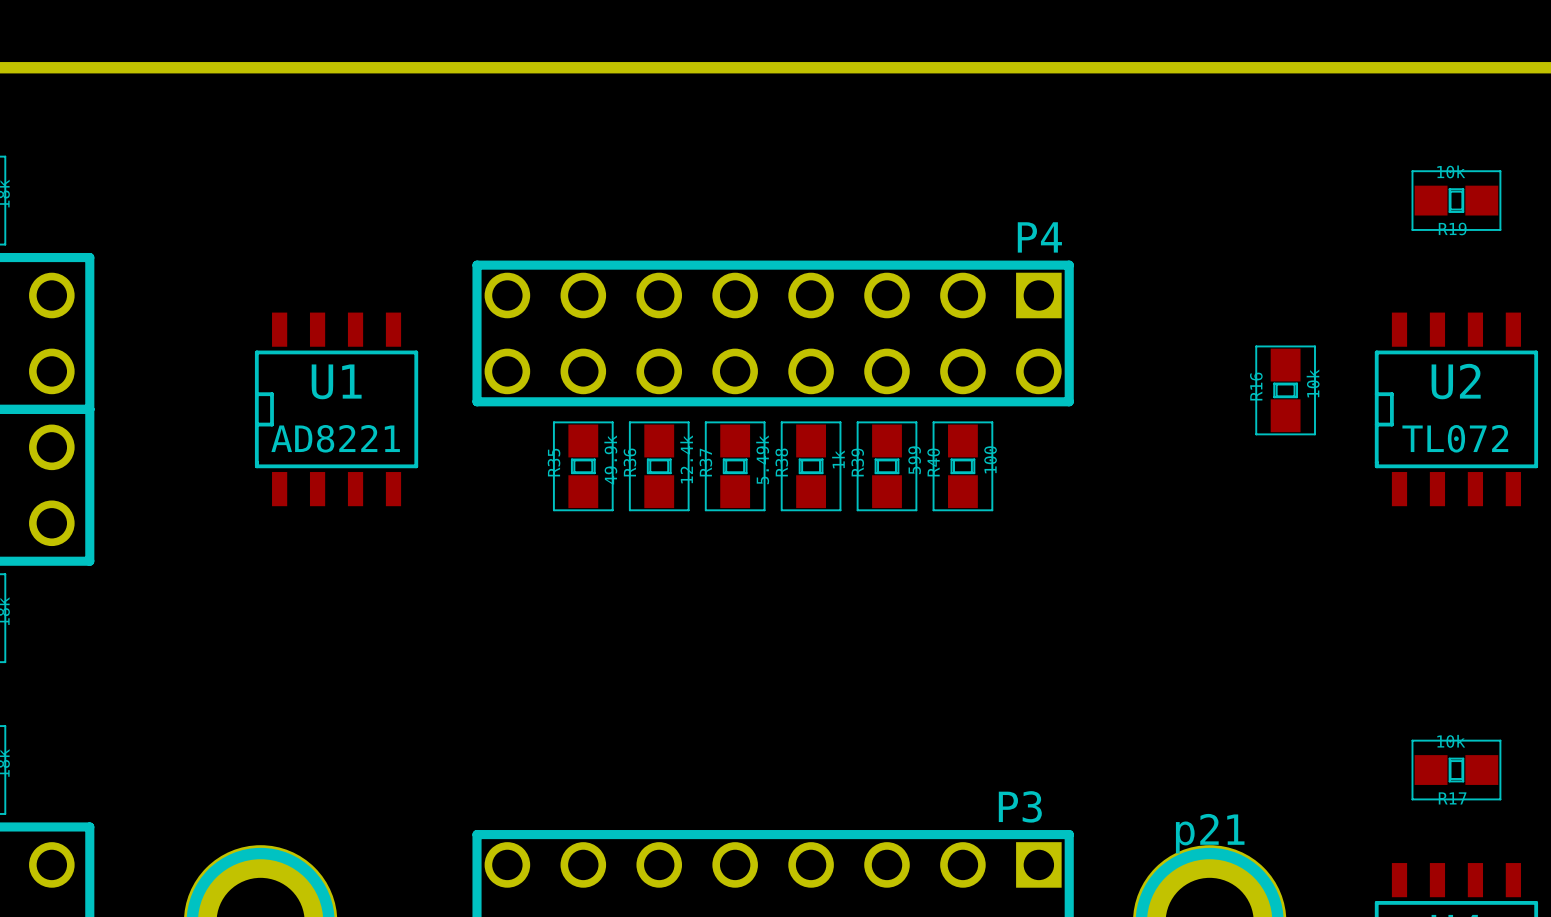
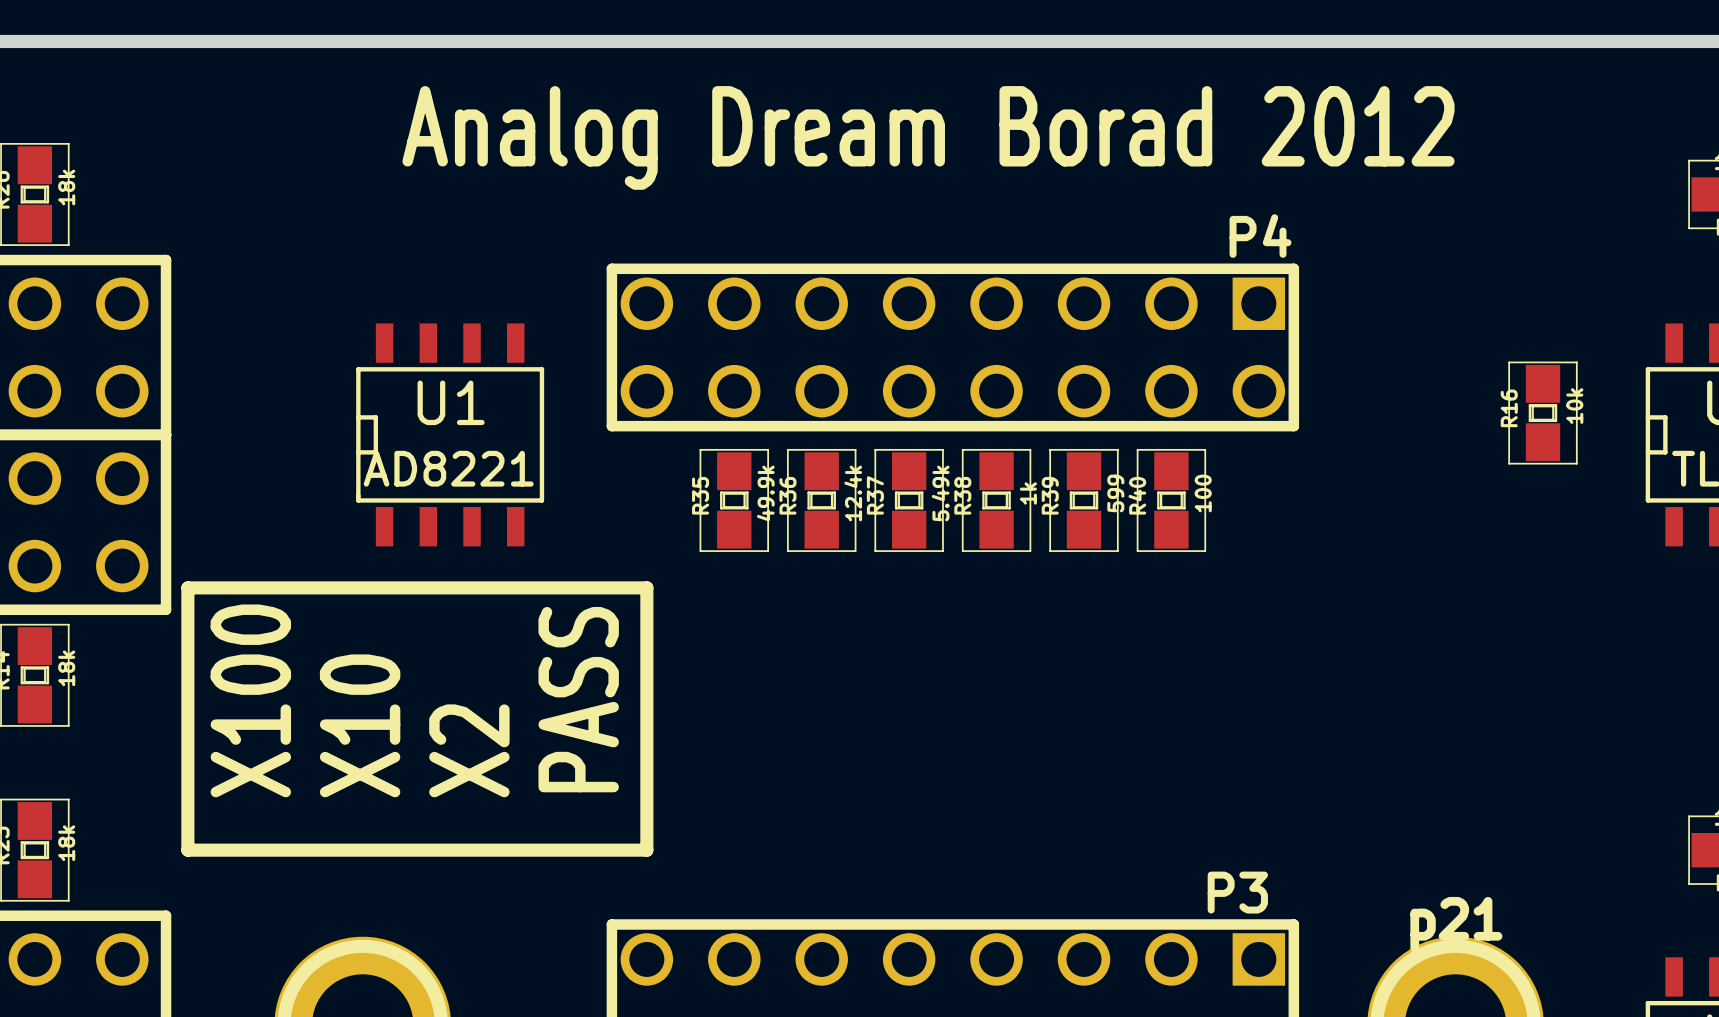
text: none -> Analog Dream Borad 2012 (928, 137)
line: none -> (187, 587) (187, 850) (646, 850) (646, 587) (187, 587)
text: none -> PASS (578, 699)
text: none -> X100 (250, 700)
text: none -> X10 (360, 725)
text: none -> X2 (469, 750)

